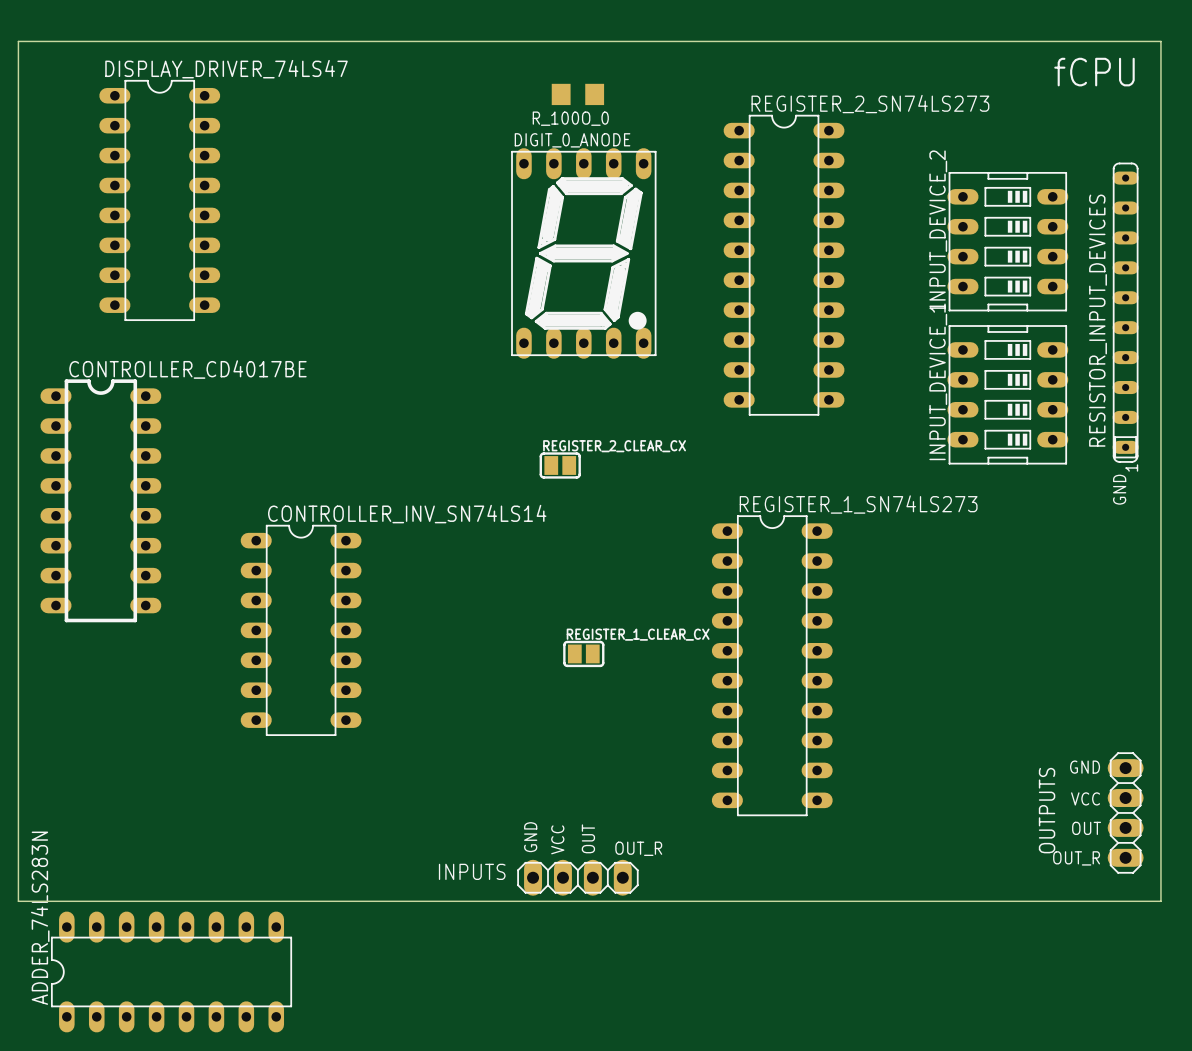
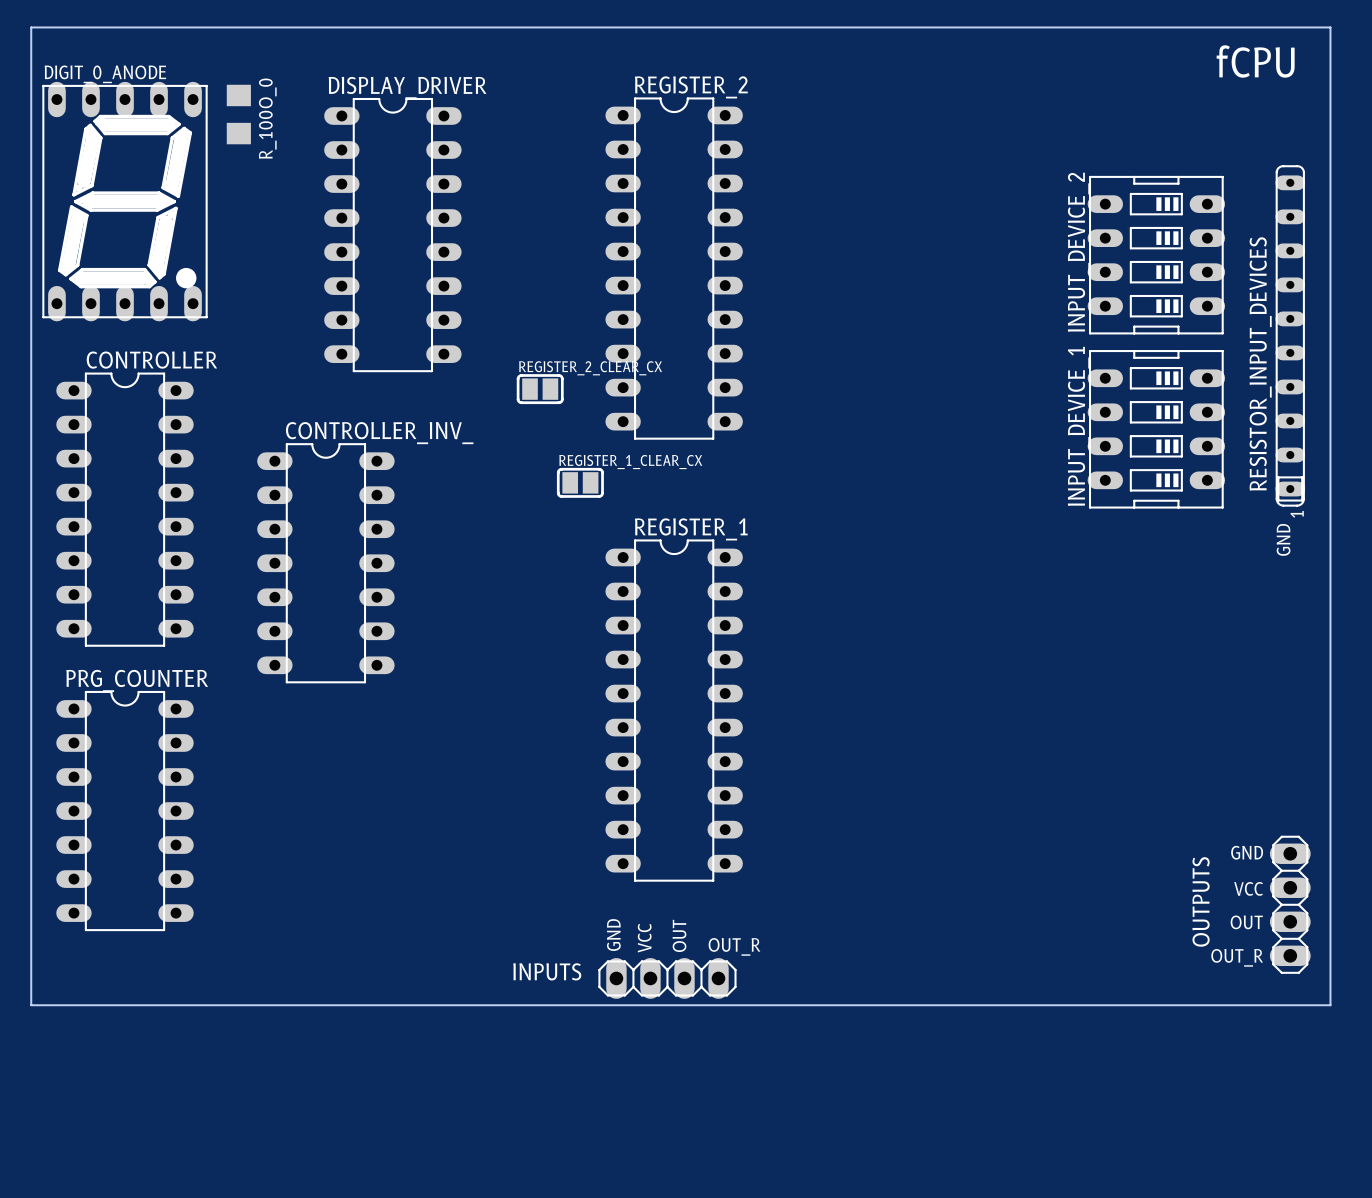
R_100O_0 rotation: 0° (577, 94) -> 90° clockwise (238, 114)
R_100O_0 position: (577, 94) -> (238, 114)
R_100O_0 name position: R_100O_0 (570, 118) -> R_100O_0 (267, 118)
DISPLAY_DRIVER_74LS47: (159, 200) -> none
DISPLAY_DRIVER: none -> (392, 235)
DIGIT_0_ANODE position: (583, 253) -> (124, 201)
REGISTER_2: none -> (674, 268)
REGISTER_2_SN74LS273: (784, 265) -> none
CONTROLLER: none -> (124, 509)
REGISTER_2_CLEAR_CX position: (560, 465) -> (540, 389)
CONTROLLER_CD4017BE: (100, 500) -> none
CONTROLLER_INV_: none -> (325, 563)
CONTROLLER_INV_SN74LS14: (301, 630) -> none
REGISTER_1: none -> (674, 710)
REGISTER_1_CLEAR_CX position: (583, 653) -> (580, 482)
REGISTER_1_SN74LS273: (772, 665) -> none
PRG_COUNTER: none -> (124, 811)
ADDER_74LS283N: (171, 971) -> none

